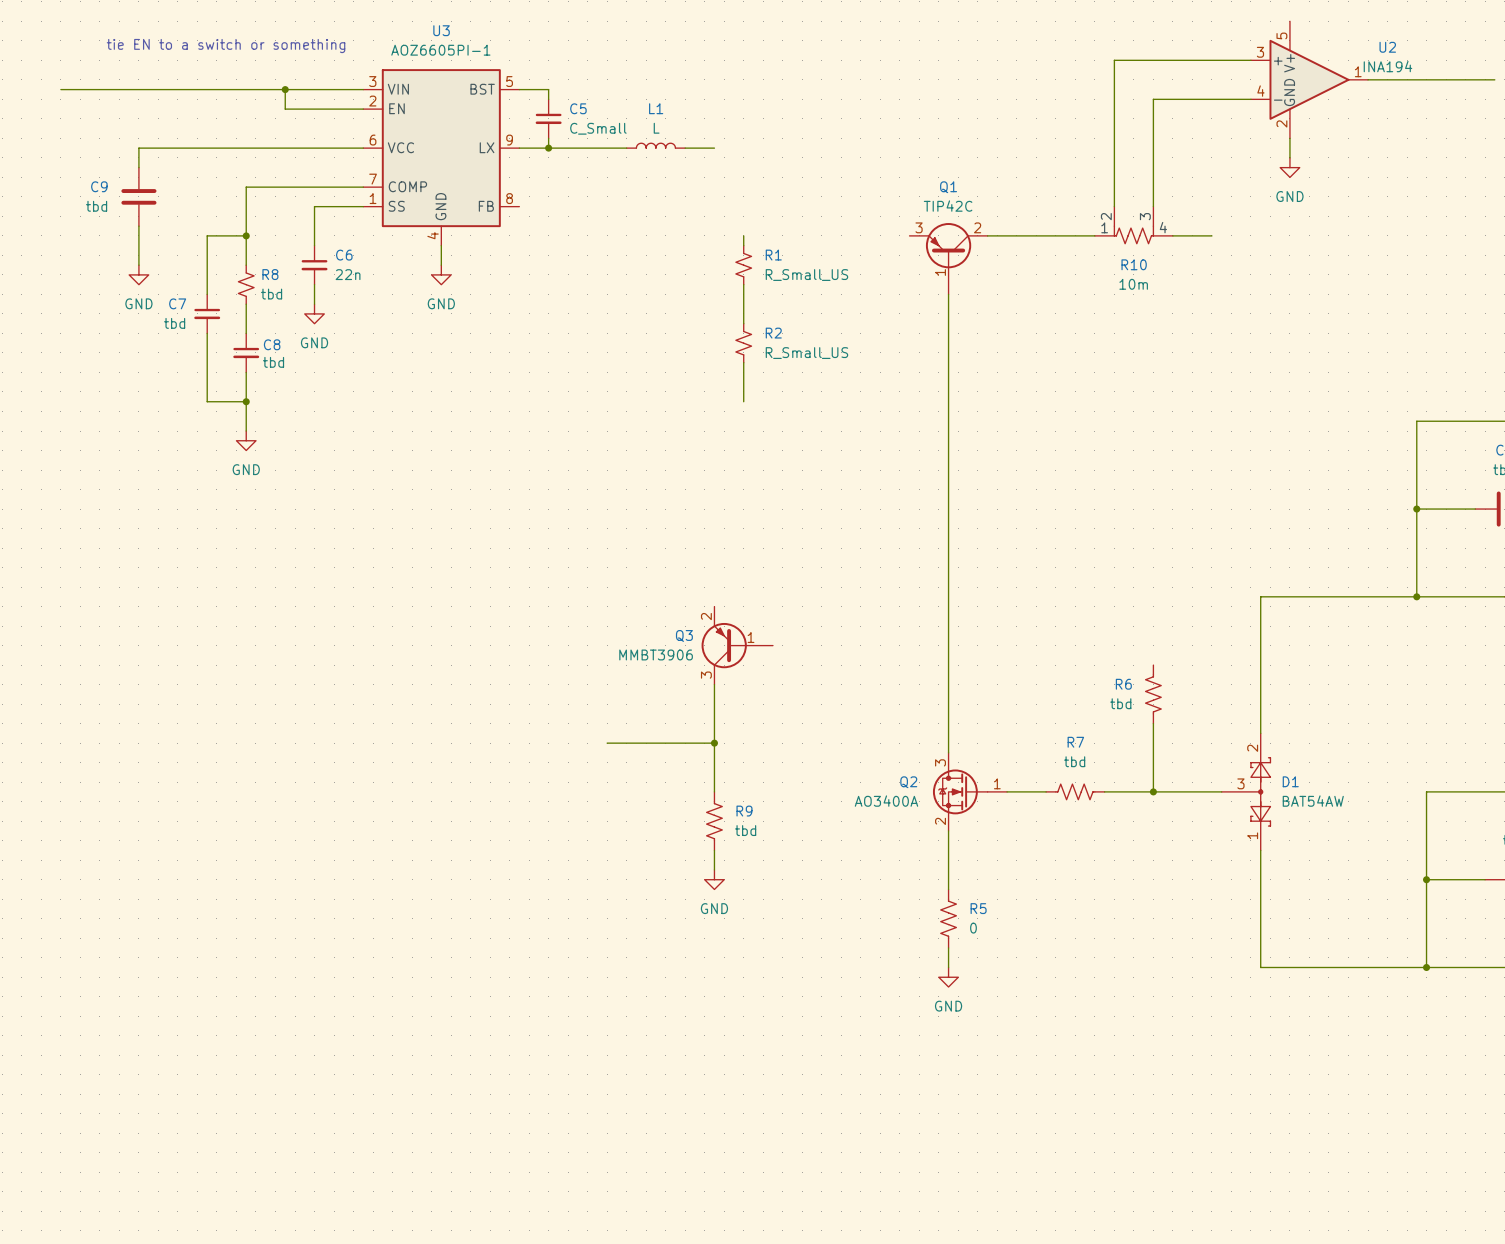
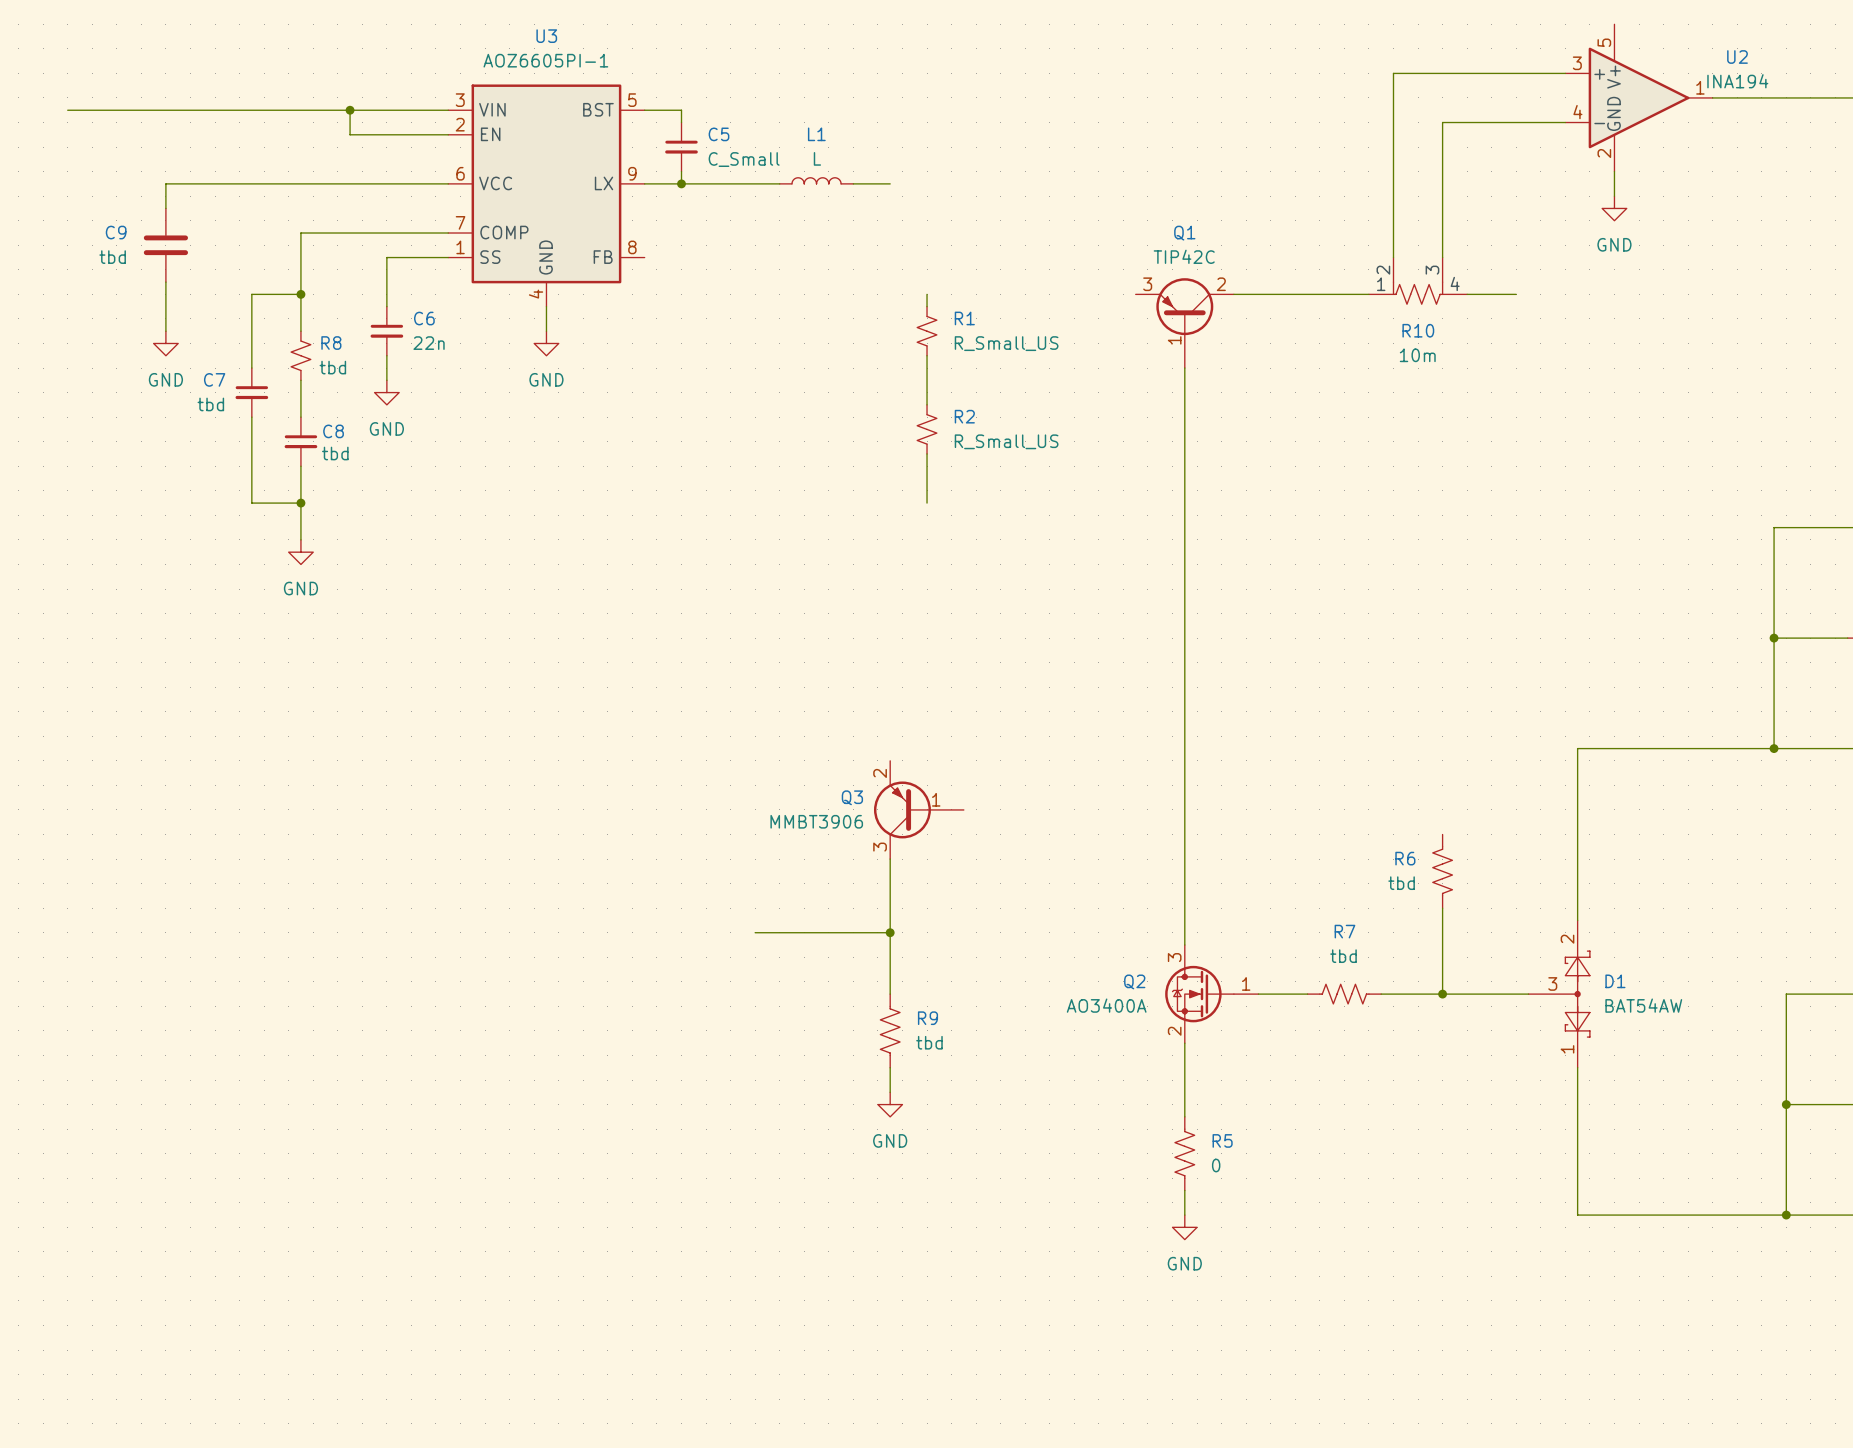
text: tie EN to a switch or something (226, 46) -> none

